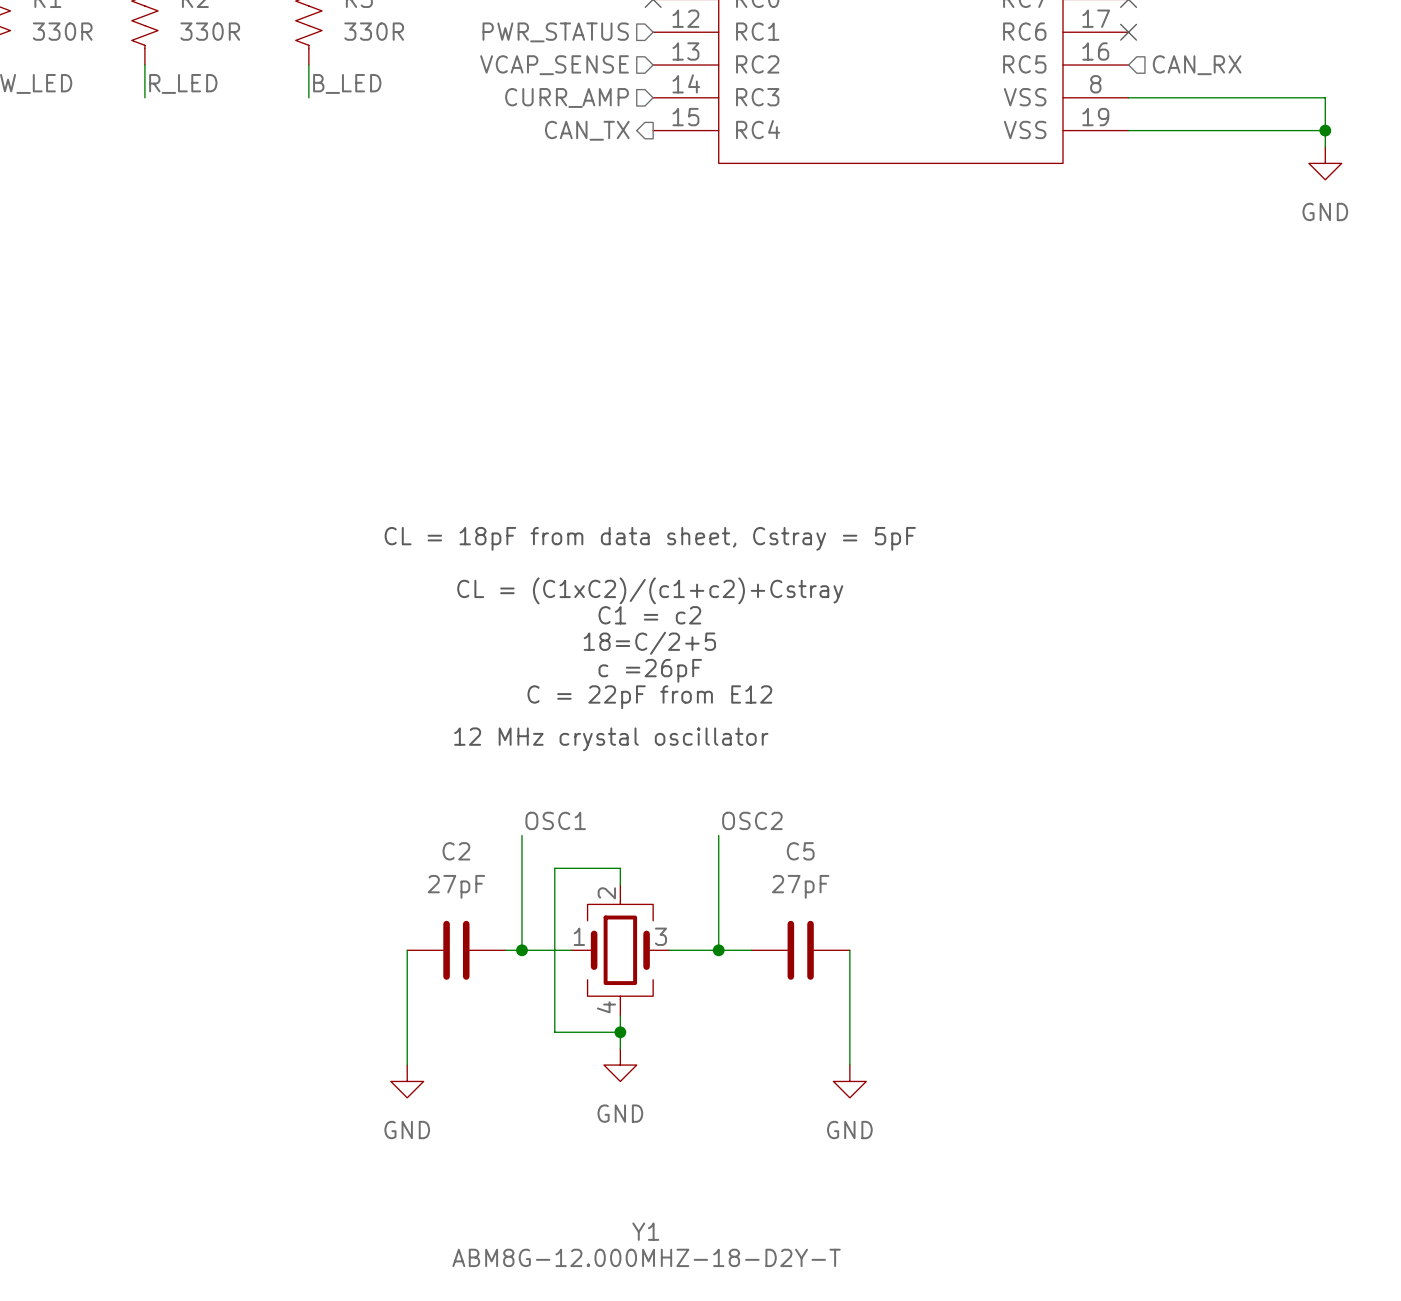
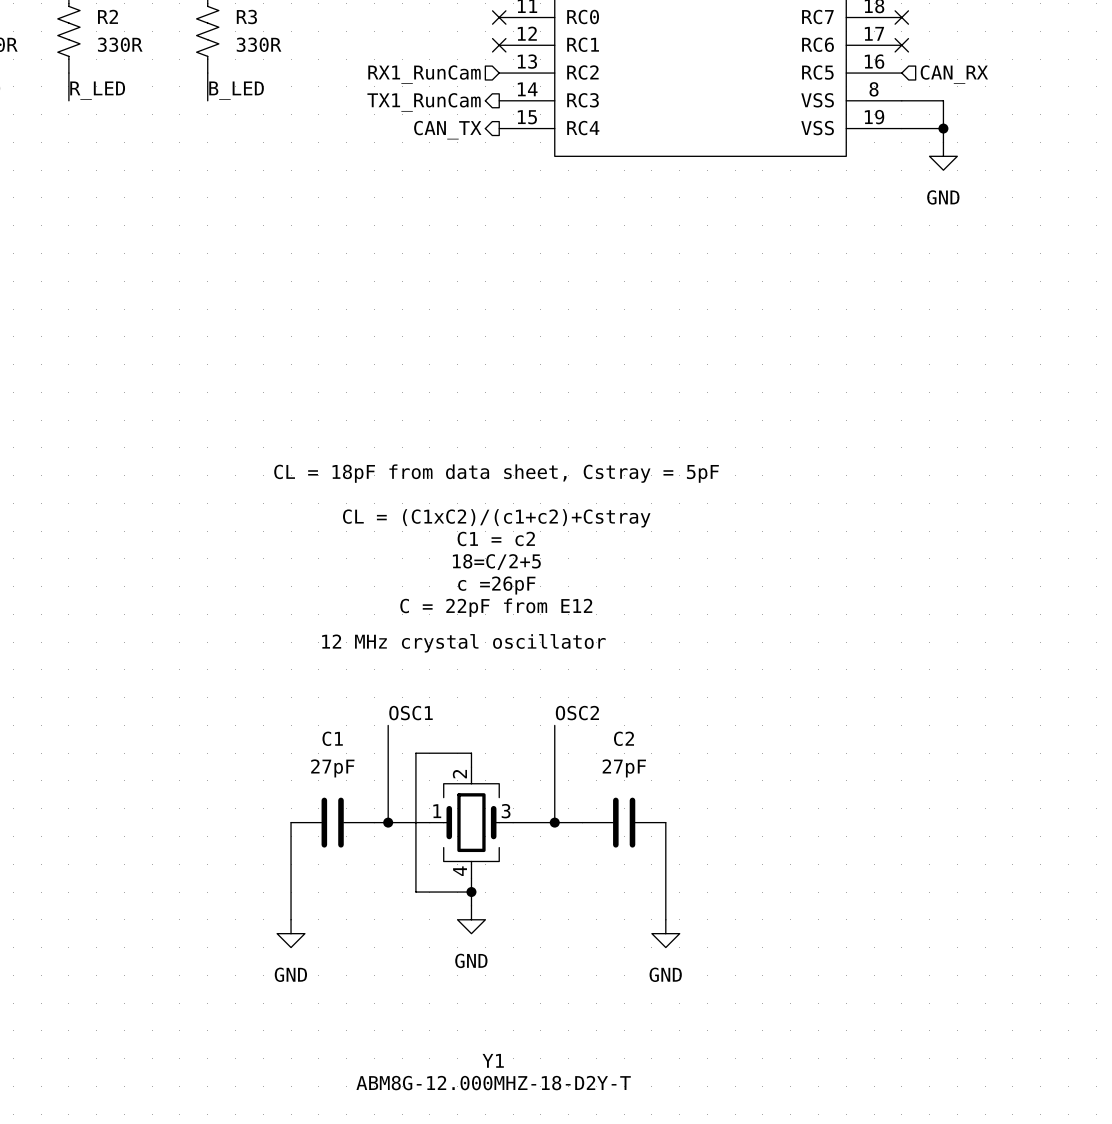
hierarchical label: PWR_STATUS (555, 32) -> none
no-connect mark: none -> (499, 45)
hierarchical label: VCAP_SENSE (554, 65) -> RX1_RunCam (424, 74)
hierarchical label shape: input (567, 97) -> output (424, 102)
hierarchical label: CURR_AMP (567, 97) -> TX1_RunCam (424, 102)
wire: (1177, 97) (1325, 97) (1325, 146) -> (943, 100) (943, 142)
wire: (1177, 130) (1325, 130) -> none
junction: none -> (943, 128)
junction: (1325, 130) -> none
power symbol position: GND (1325, 163) -> GND (943, 156)
C2 name: C2 (456, 851) -> C1 (332, 738)
C5 name: C5 (800, 851) -> C2 (624, 738)

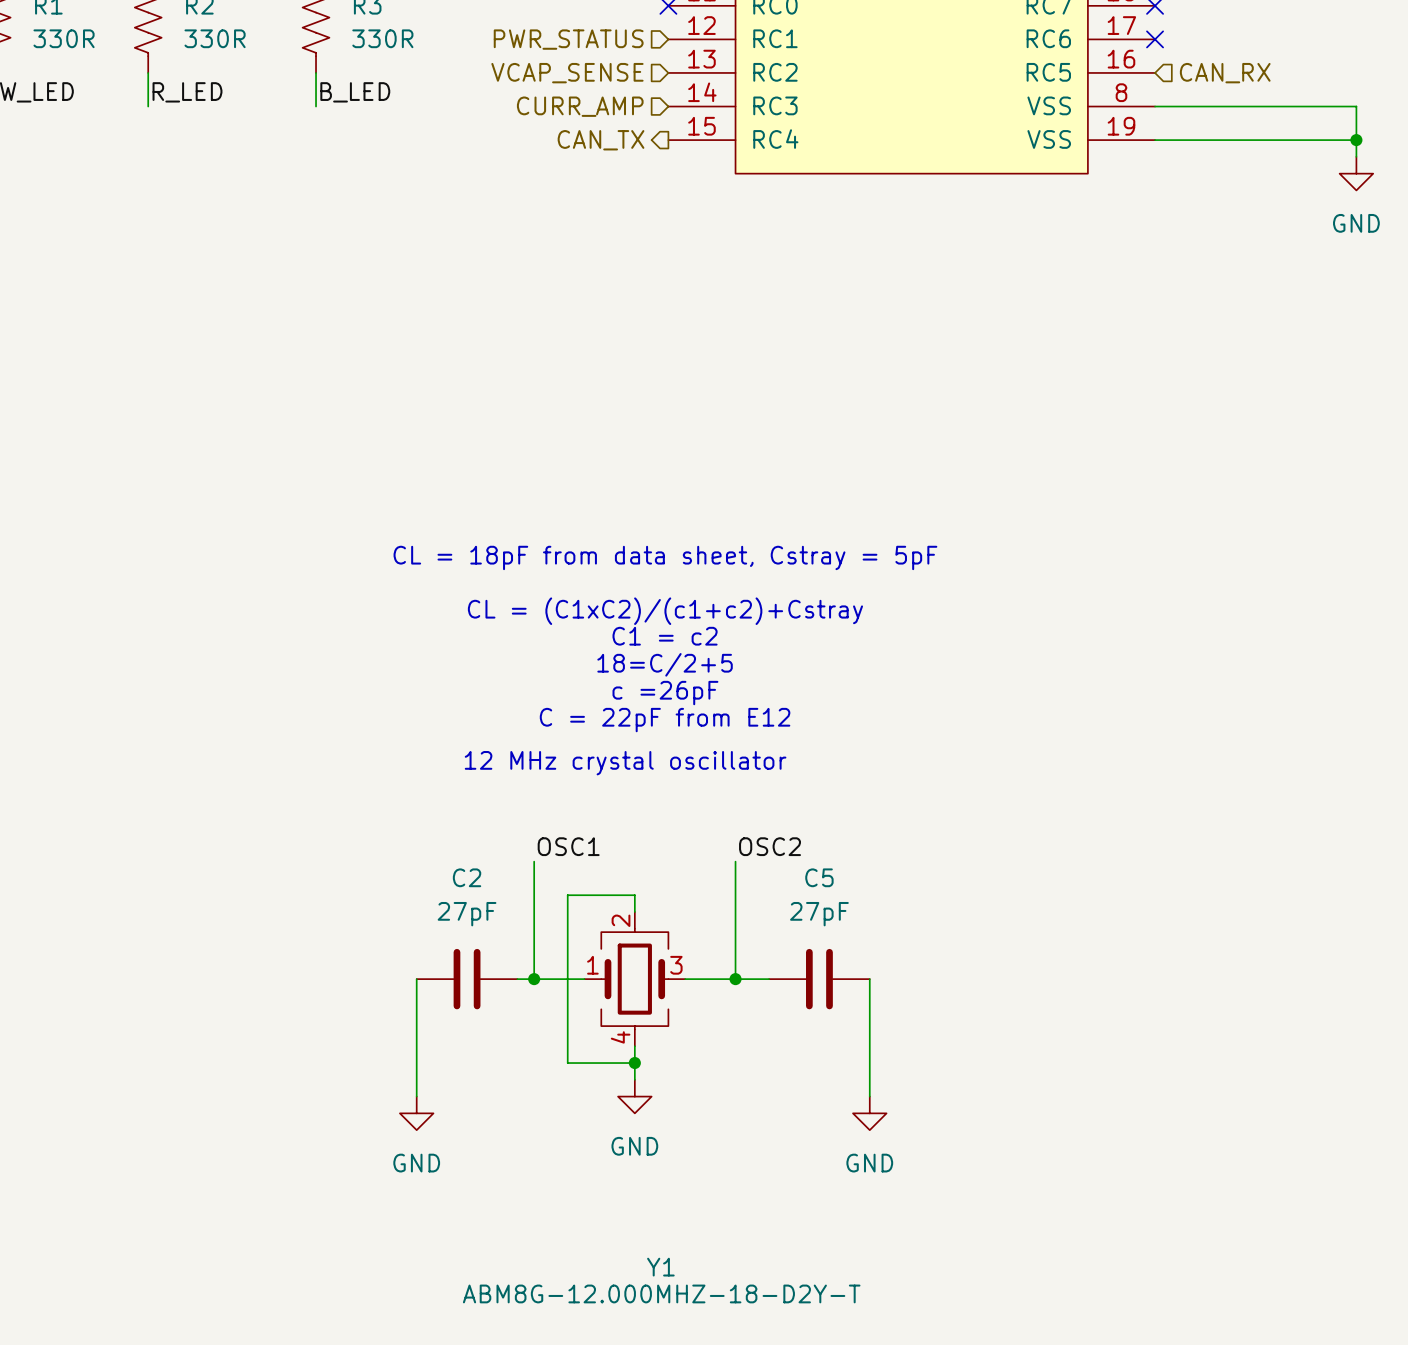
no-connect mark: (499, 45) -> none
hierarchical label: none -> PWR_STATUS (568, 39)
hierarchical label: RX1_RunCam (424, 74) -> VCAP_SENSE (567, 73)
wire: (943, 100) (943, 142) -> (1205, 106) (1356, 106) (1356, 156)
hierarchical label shape: output (424, 102) -> input (580, 106)
hierarchical label: TX1_RunCam (424, 102) -> CURR_AMP (580, 106)
wire: none -> (1205, 140) (1356, 140)
junction: (943, 128) -> none
junction: none -> (1356, 140)
power symbol position: GND (943, 156) -> GND (1356, 173)
C1 name: C1 (332, 738) -> C2 (467, 877)
C2 name: C2 (624, 738) -> C5 (819, 877)

